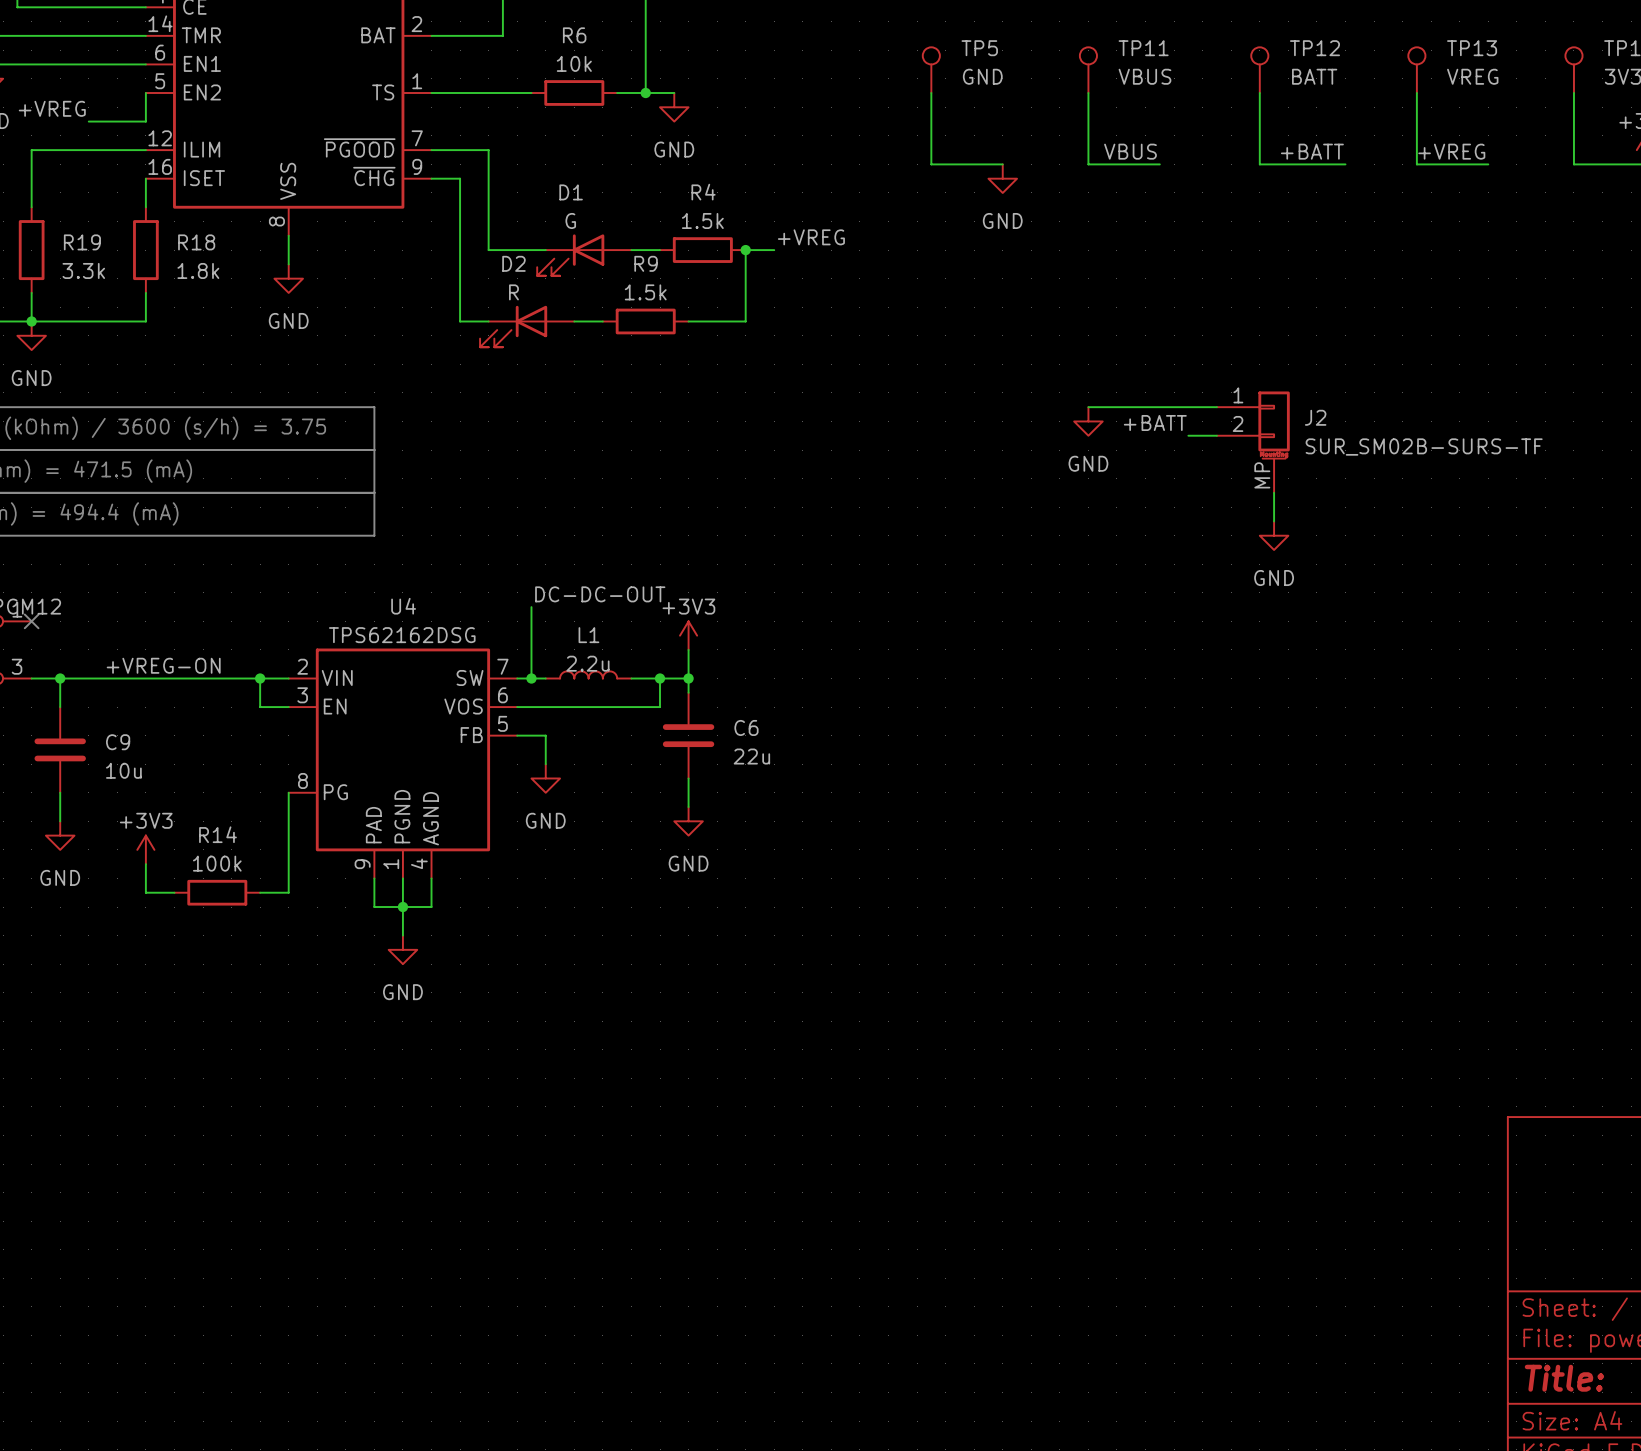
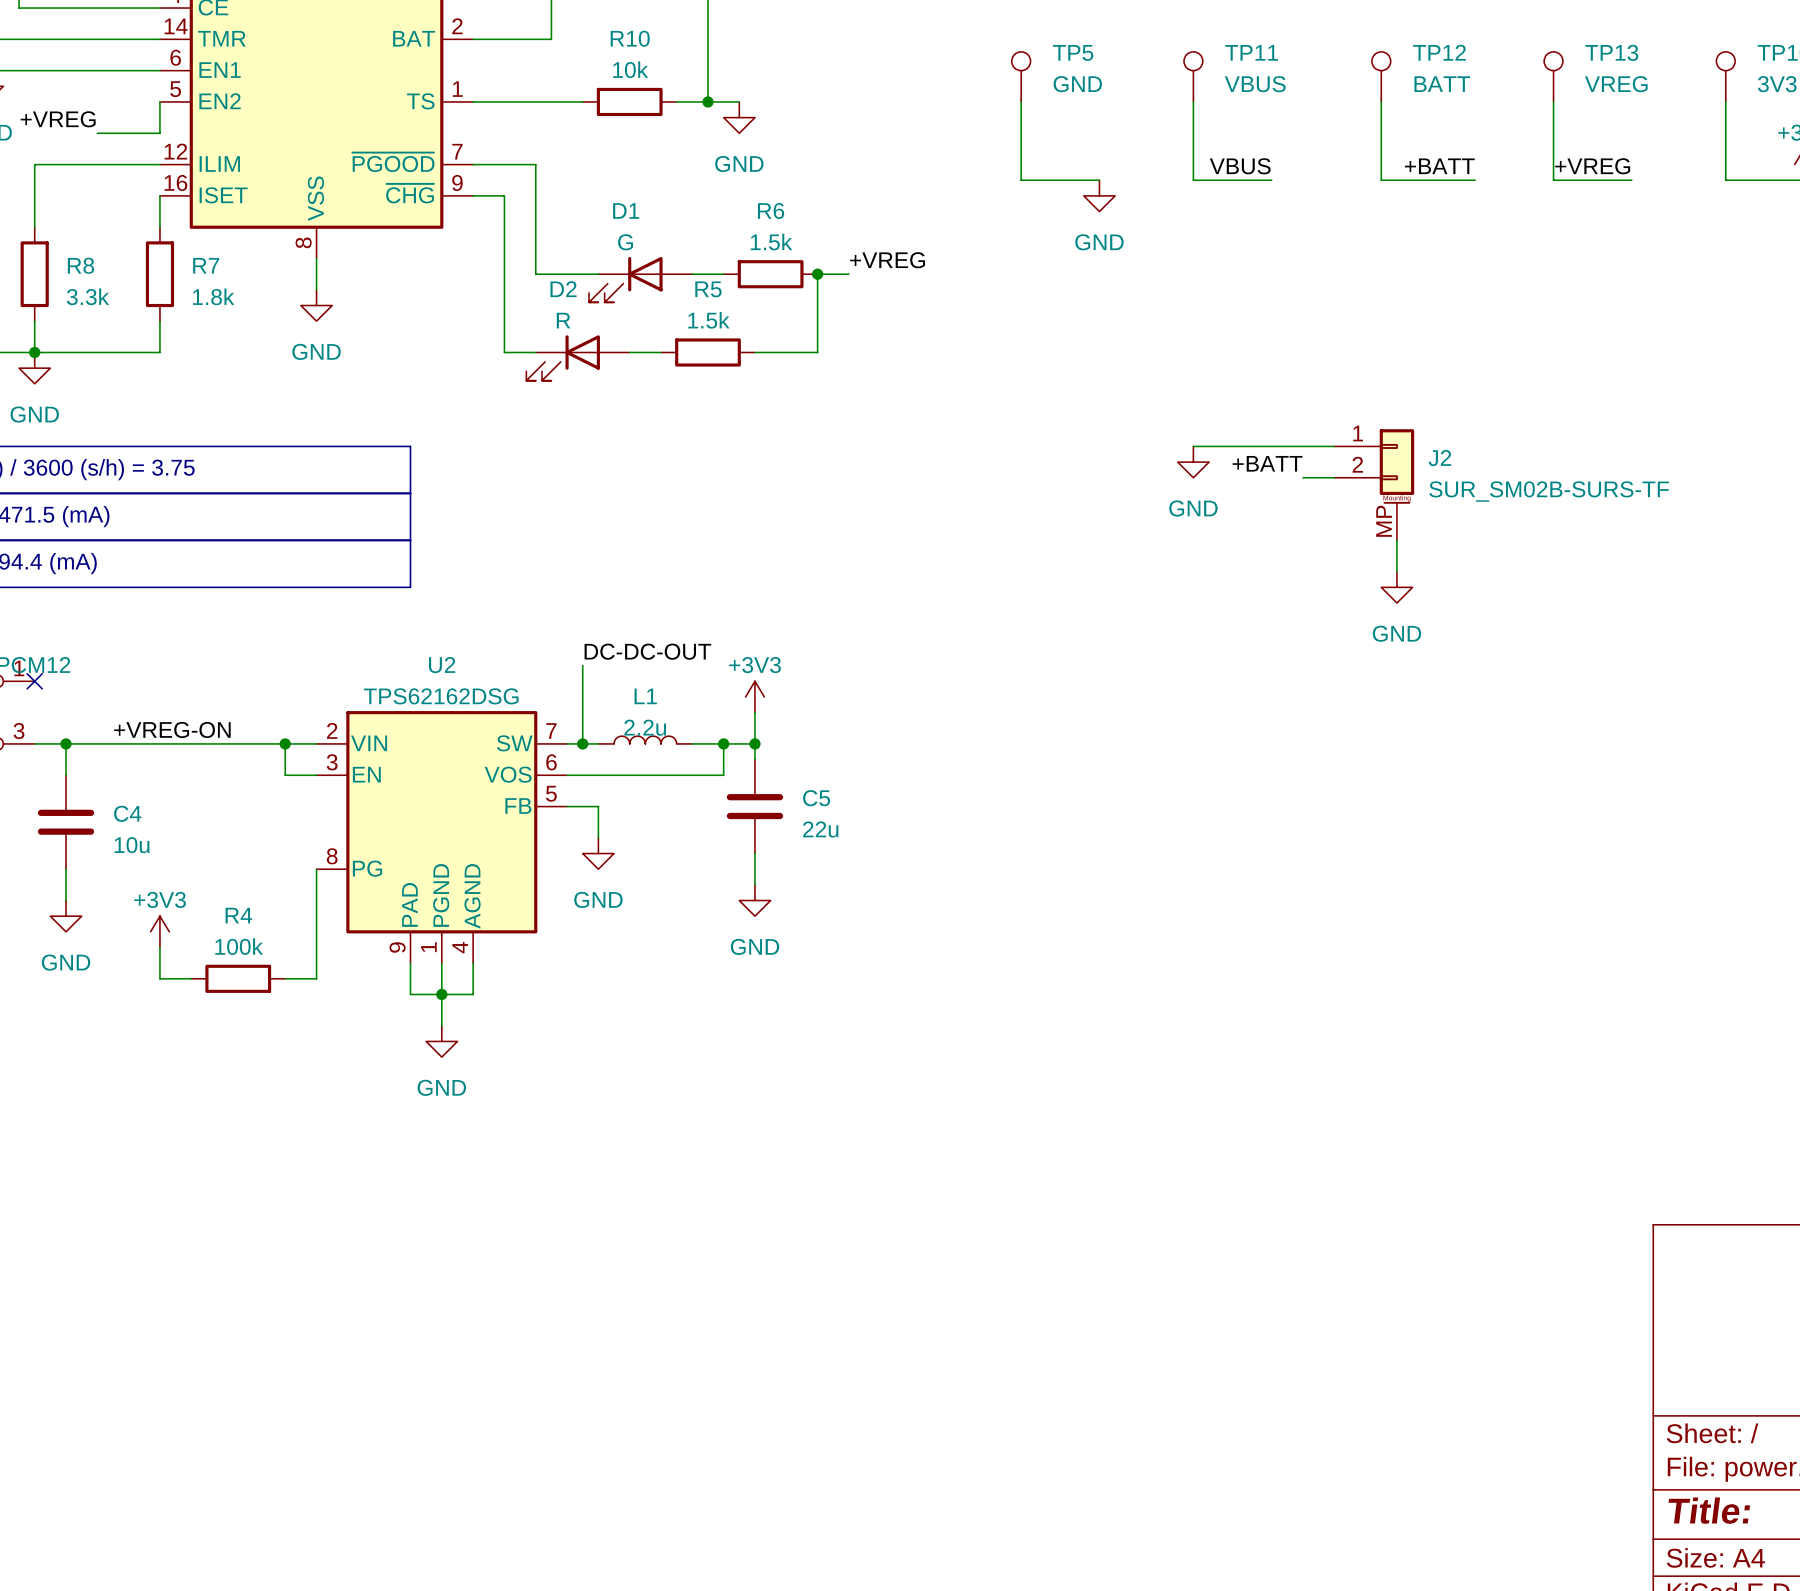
R6 name: R6 (574, 35) -> R10 (630, 38)
R4 name: R4 (703, 192) -> R6 (771, 210)
R19 name: R19 (82, 242) -> R8 (81, 265)
R18 name: R18 (196, 242) -> R7 (206, 265)
R9 name: R9 (646, 263) -> R5 (708, 289)
U4 name: U4 (403, 606) -> U2 (442, 665)
C6 name: C6 (746, 727) -> C5 (816, 798)
C9 name: C9 (118, 742) -> C4 (127, 813)
R14 name: R14 (217, 834) -> R4 (238, 915)

